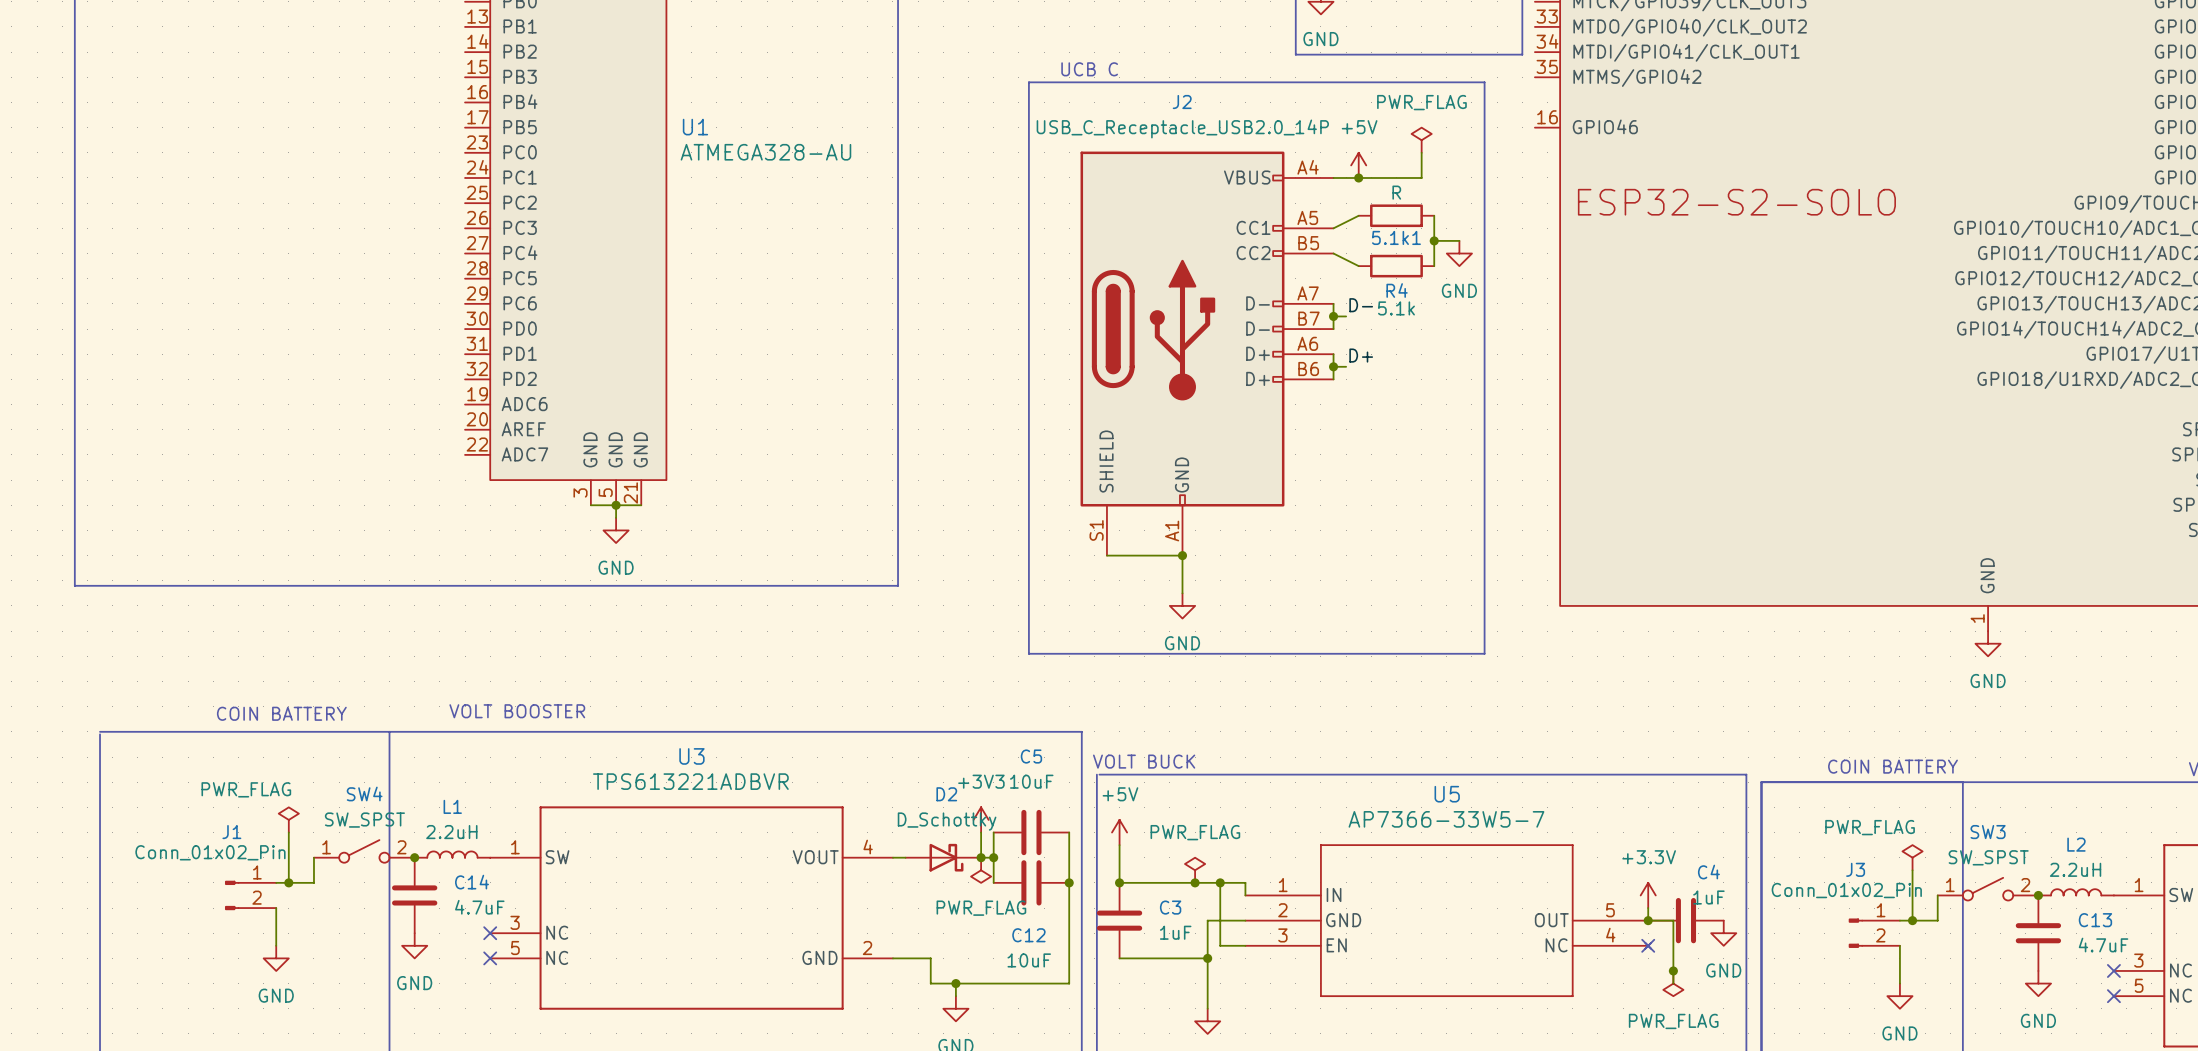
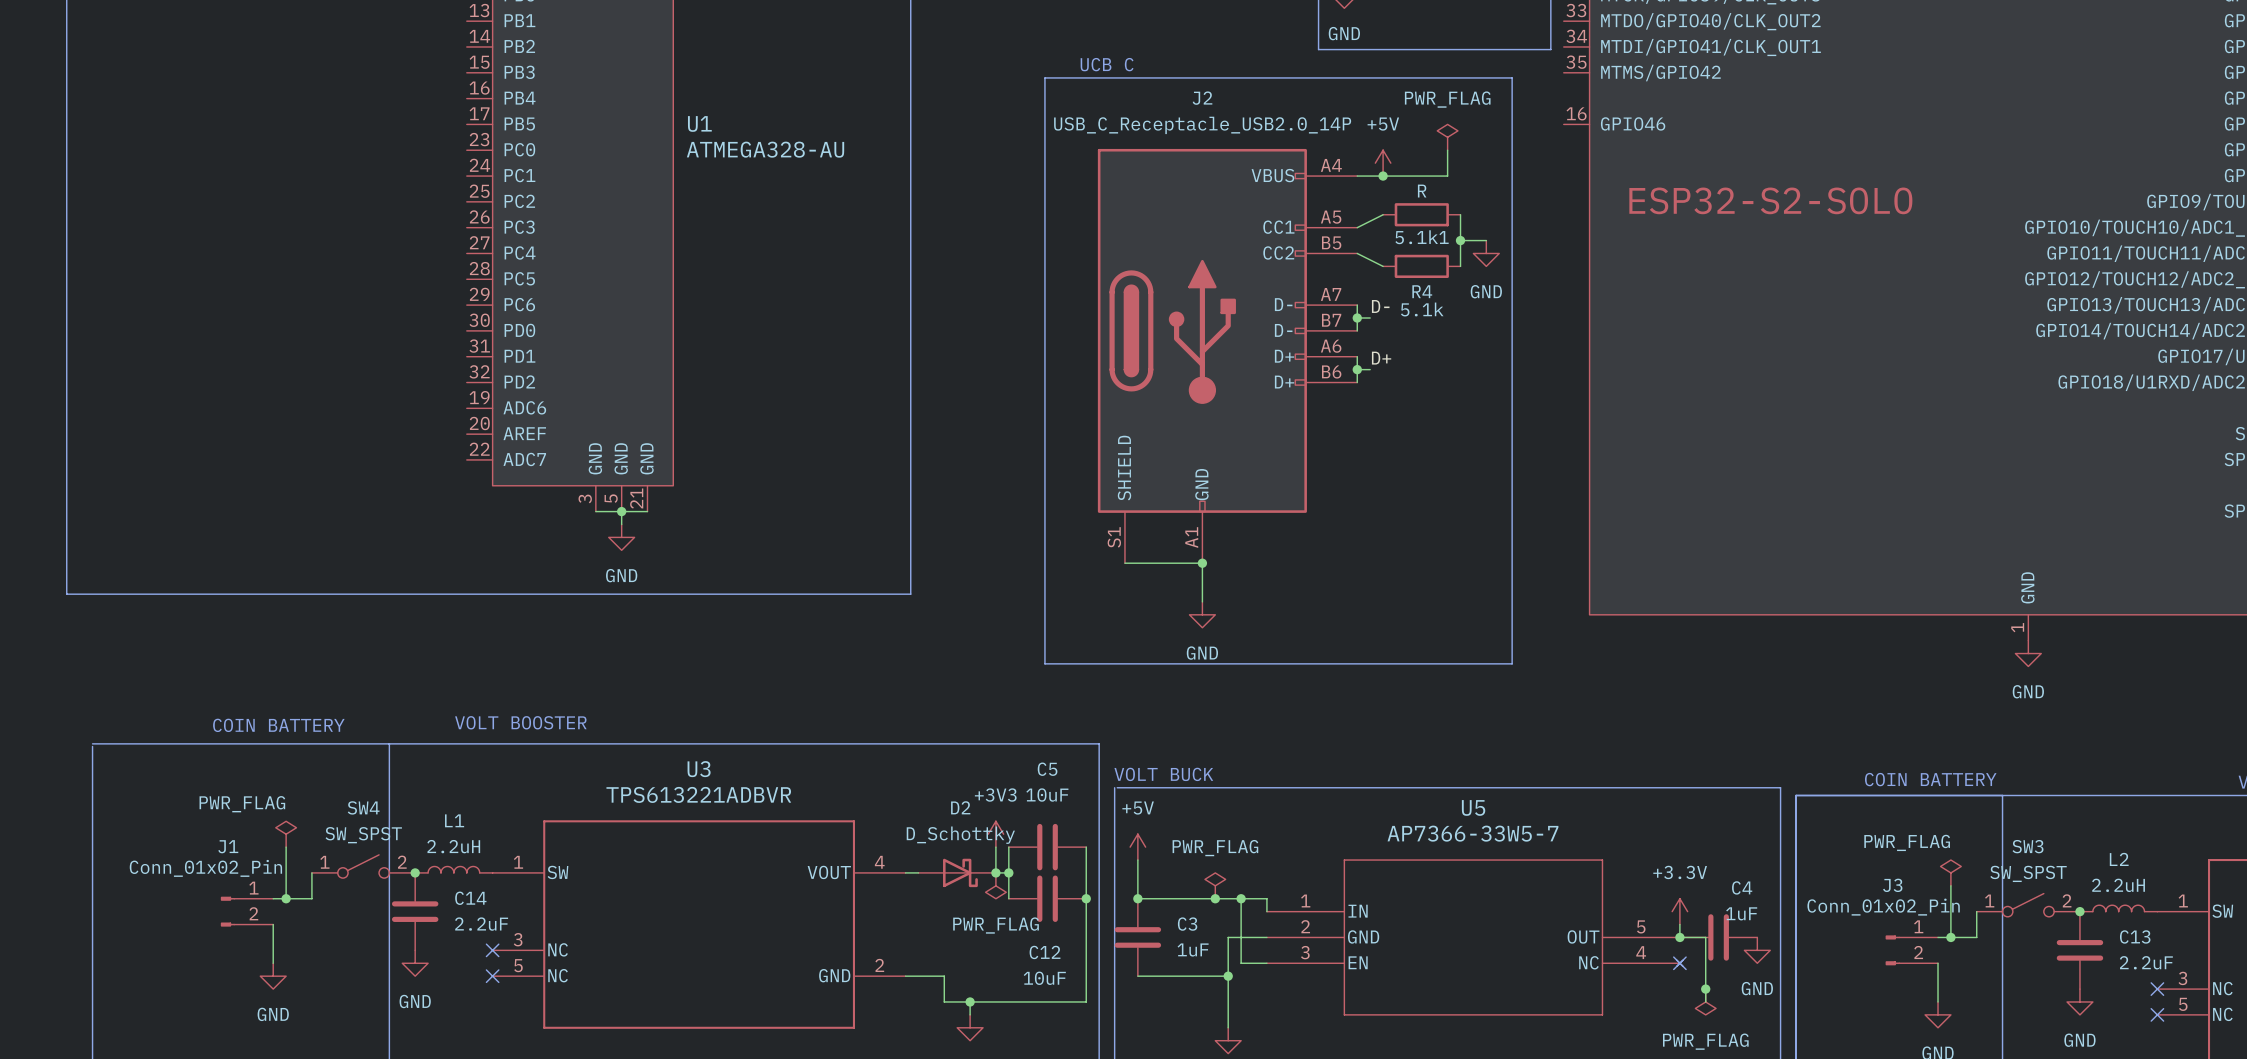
C14 value: 4.7uF (479, 907) -> 2.2uF (481, 924)
C13 value: 4.7uF (2103, 945) -> 2.2uF (2146, 962)

